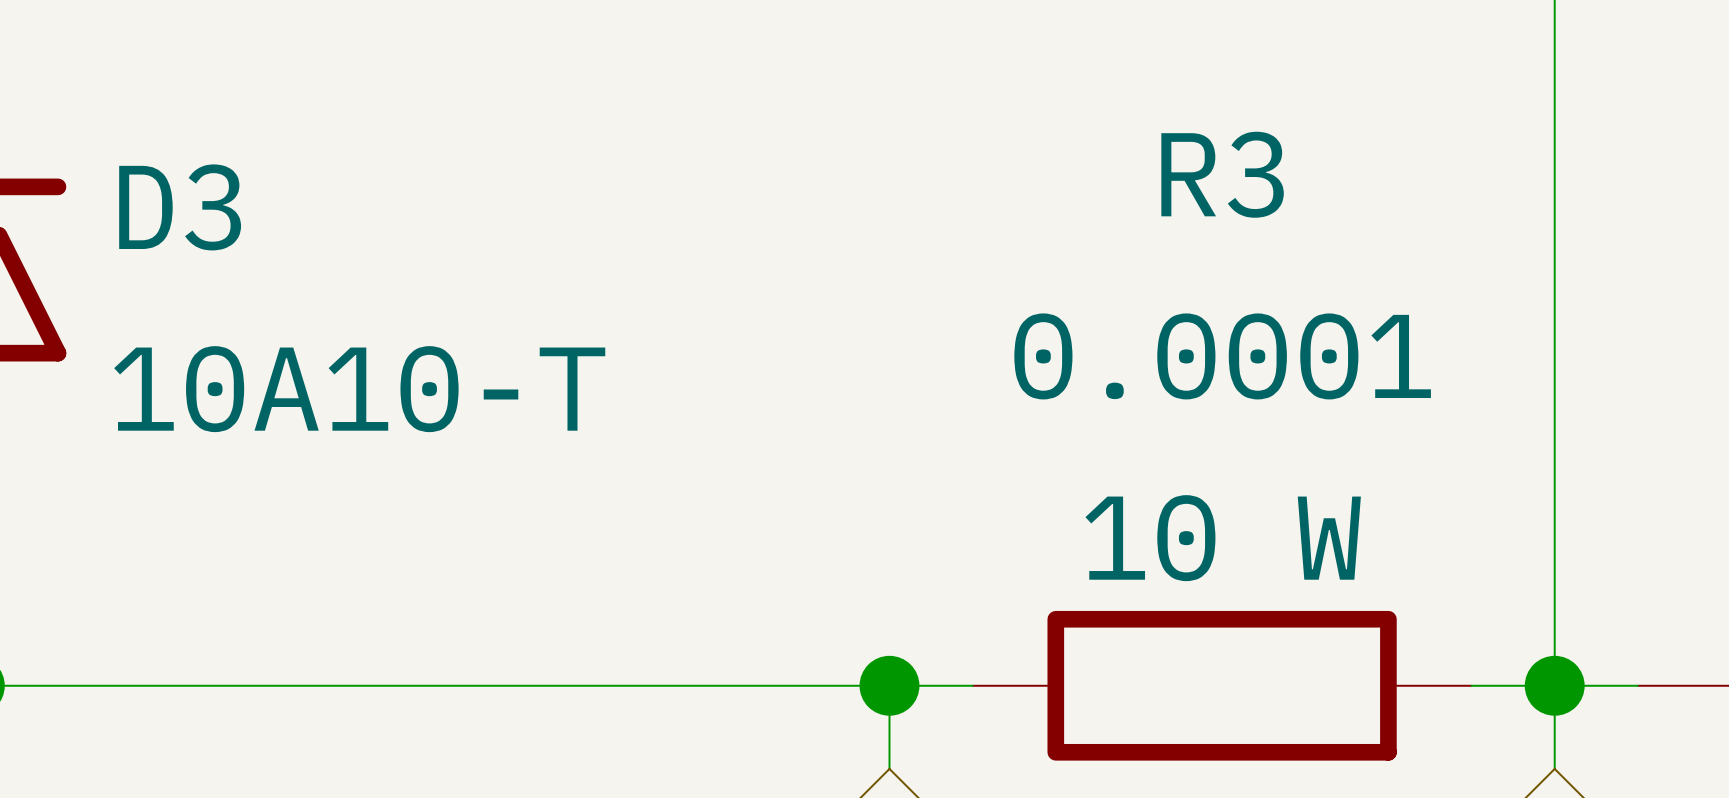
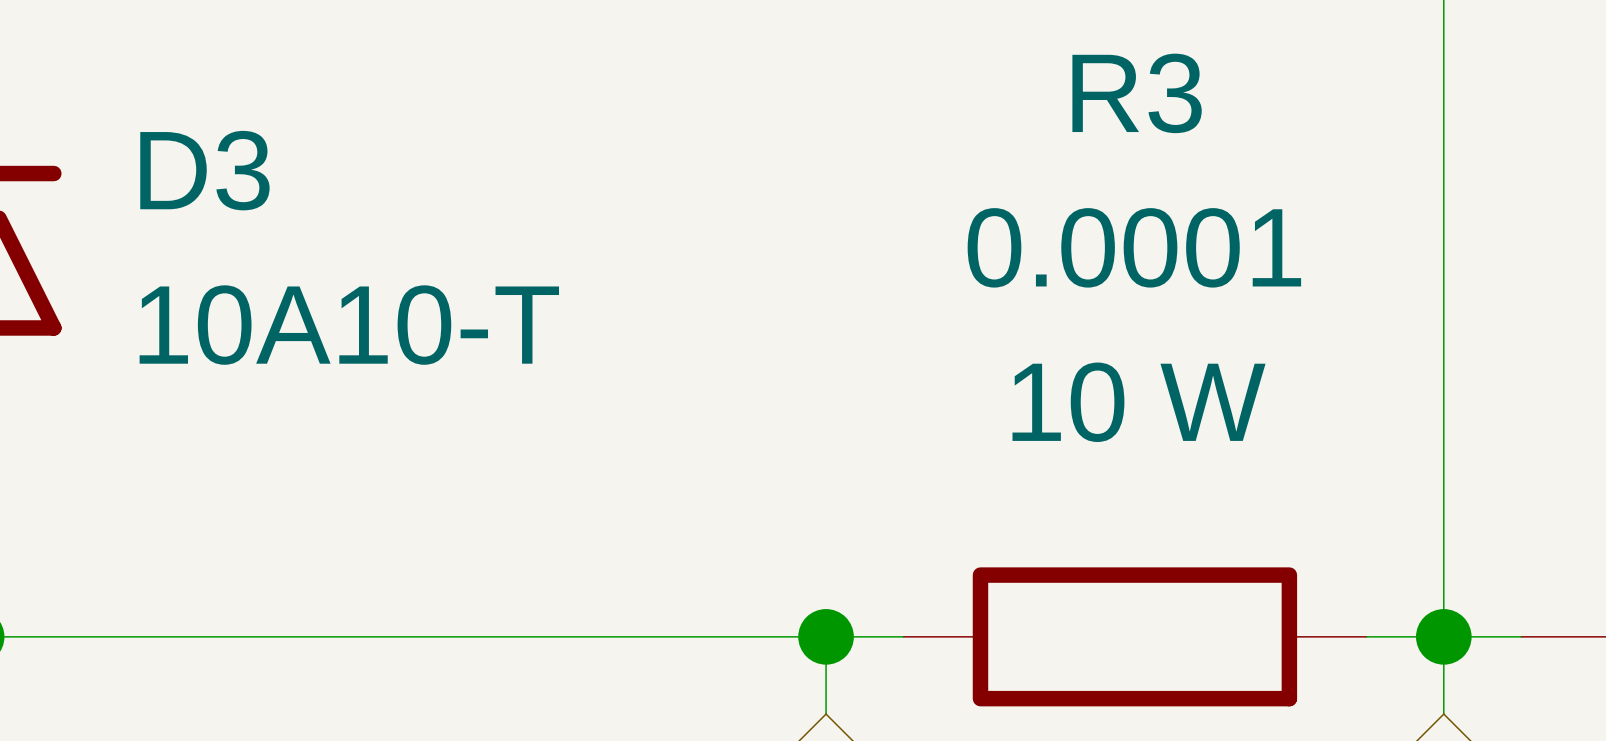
R3 name position: R3 (1222, 174) -> R3 (1137, 93)
D3 name position: D3 (180, 207) -> D3 (204, 170)
R3 value position: 0.0001 (1222, 356) -> 0.0001 (1134, 247)
D3 value position: 10A10-T (359, 389) -> 10A10-T (349, 325)
R3 text position: 10 W (1223, 538) -> 10 W (1139, 402)

